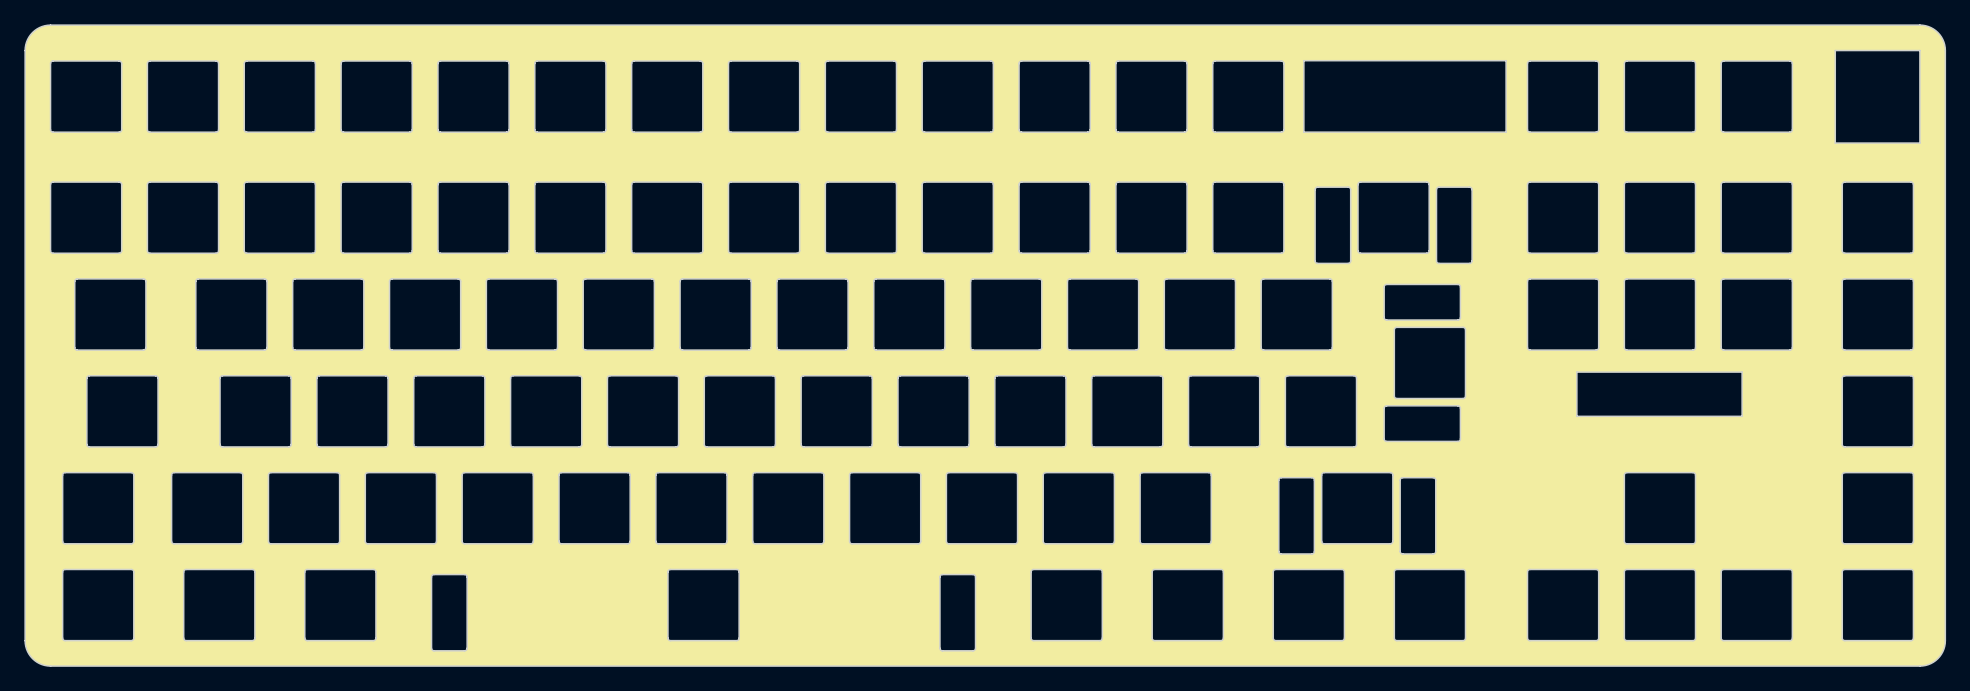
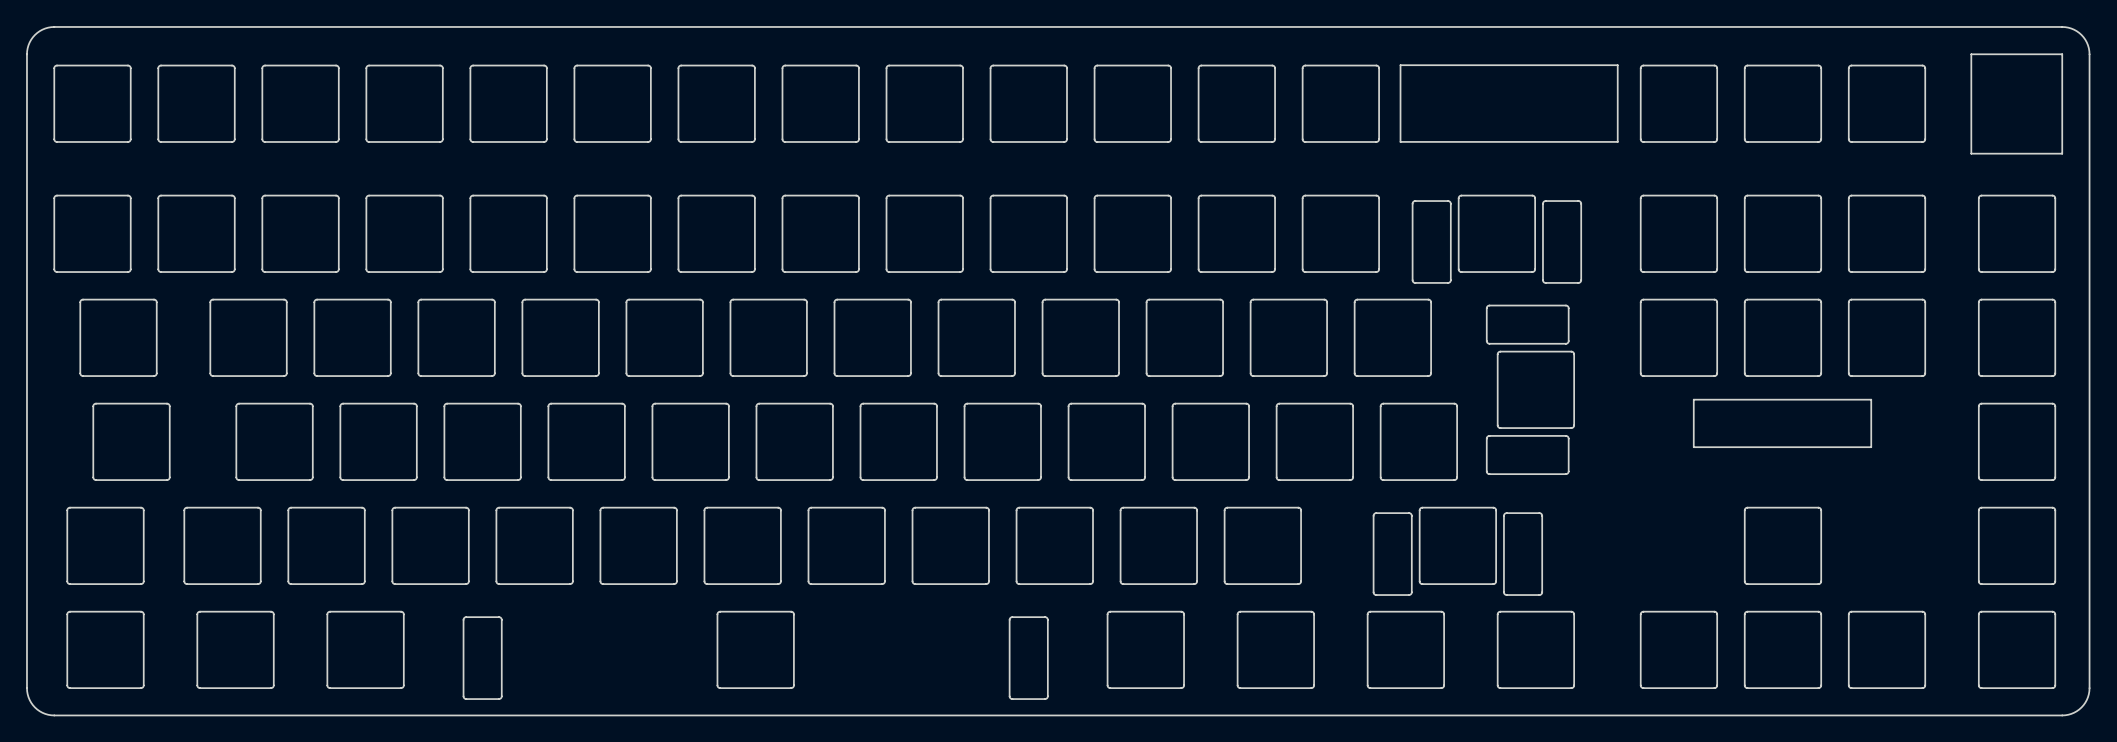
drawing: [25, 25, 1946, 667] -> none

